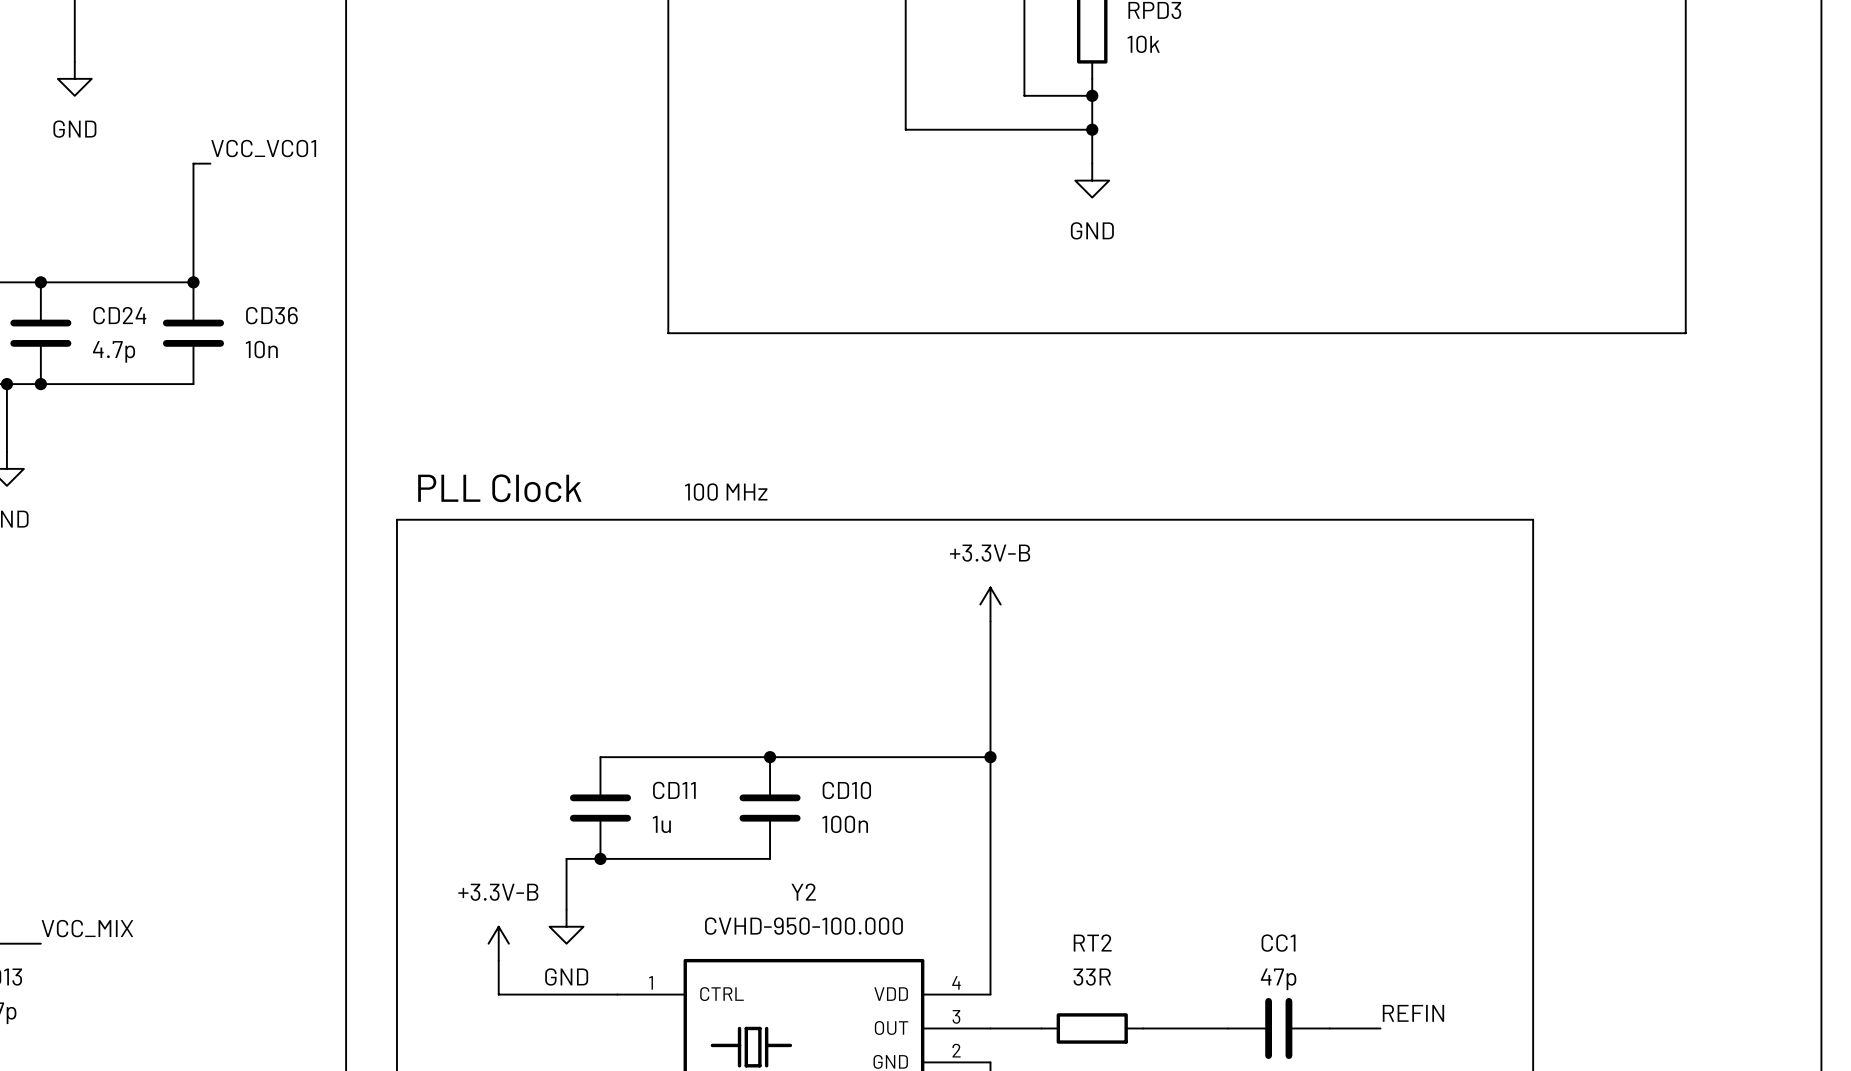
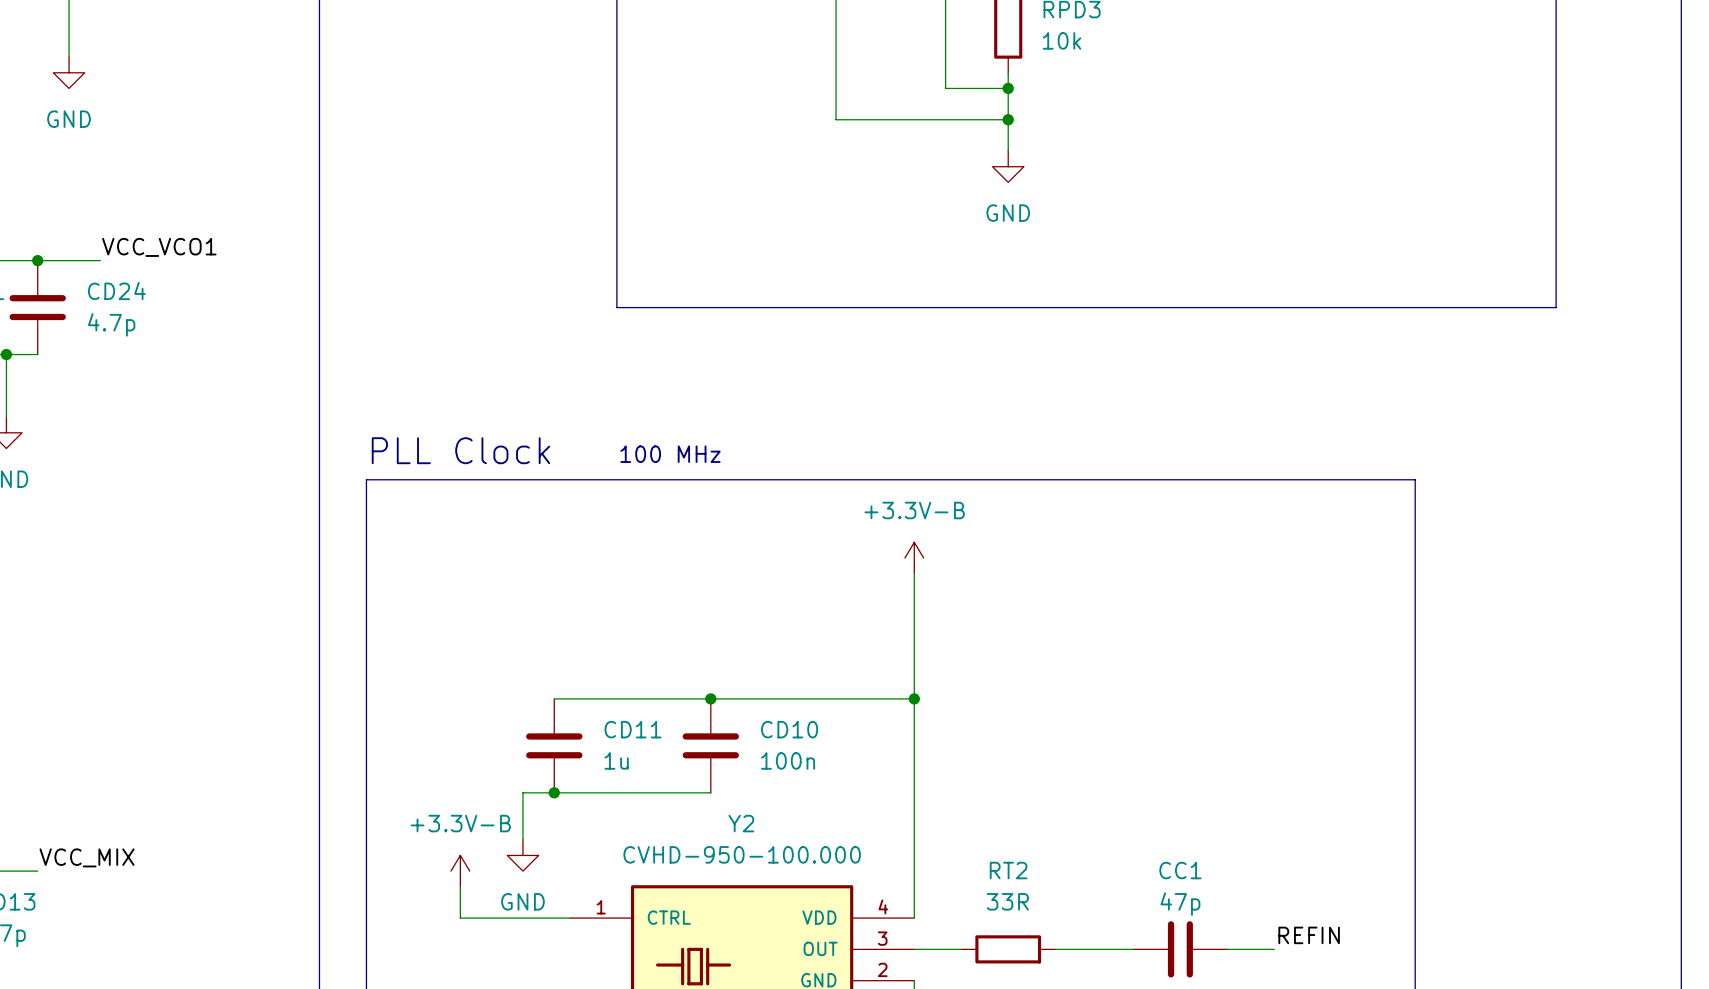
label position: VCC_VCO1 (263, 148) -> VCC_VCO1 (159, 247)
wire: (210, 163) (193, 163) (193, 282) (108, 282) -> none
junction: (193, 282) -> none
CD36: 10n (193, 333) -> none
wire: (40, 384) (193, 384) -> none
junction: (40, 384) -> none

